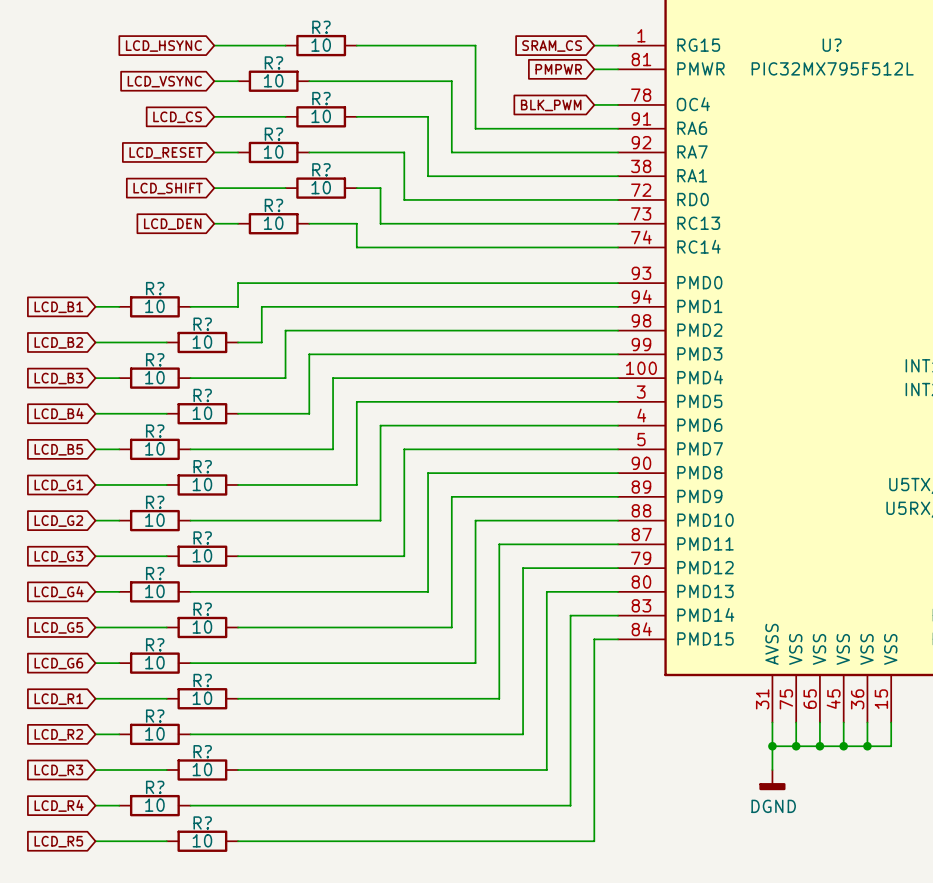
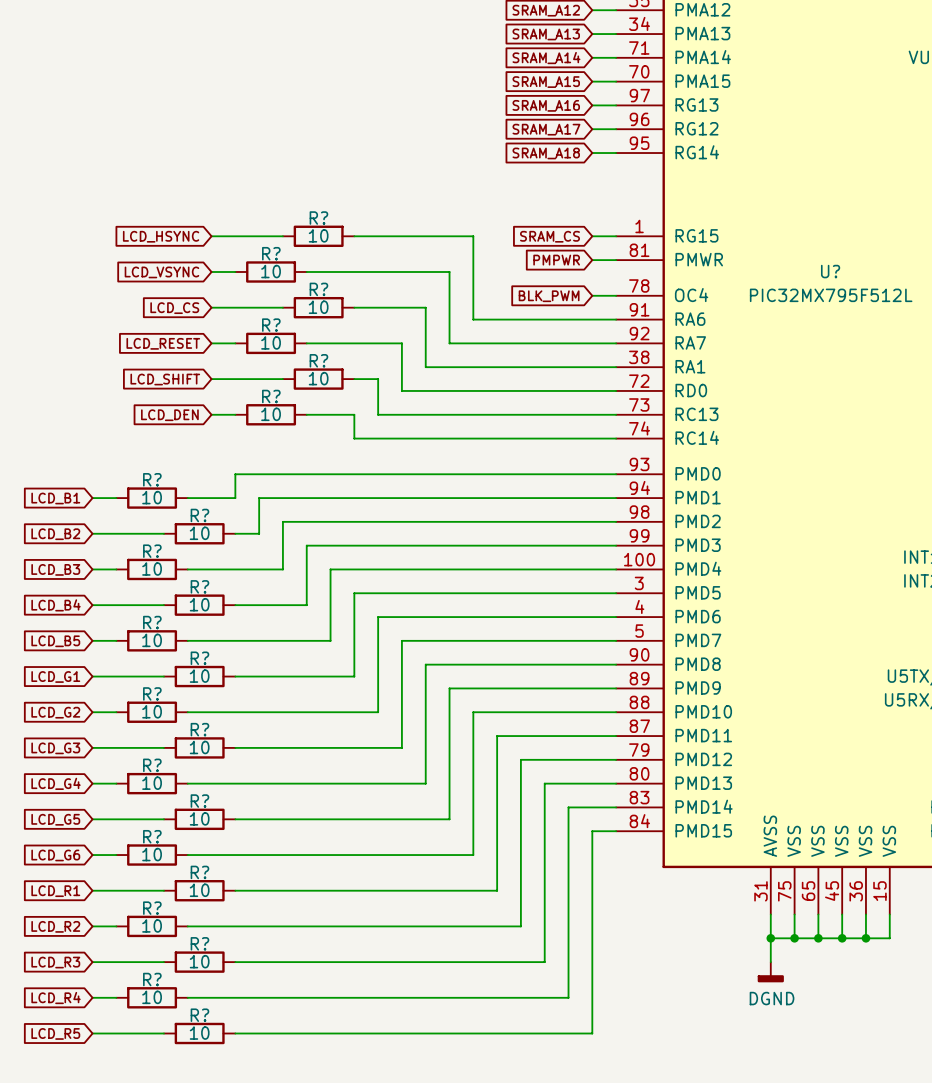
U? name position: U? (832, 45) -> U? (830, 271)
U? value position: PIC32MX795F512L (832, 68) -> PIC32MX795F512L (831, 295)

